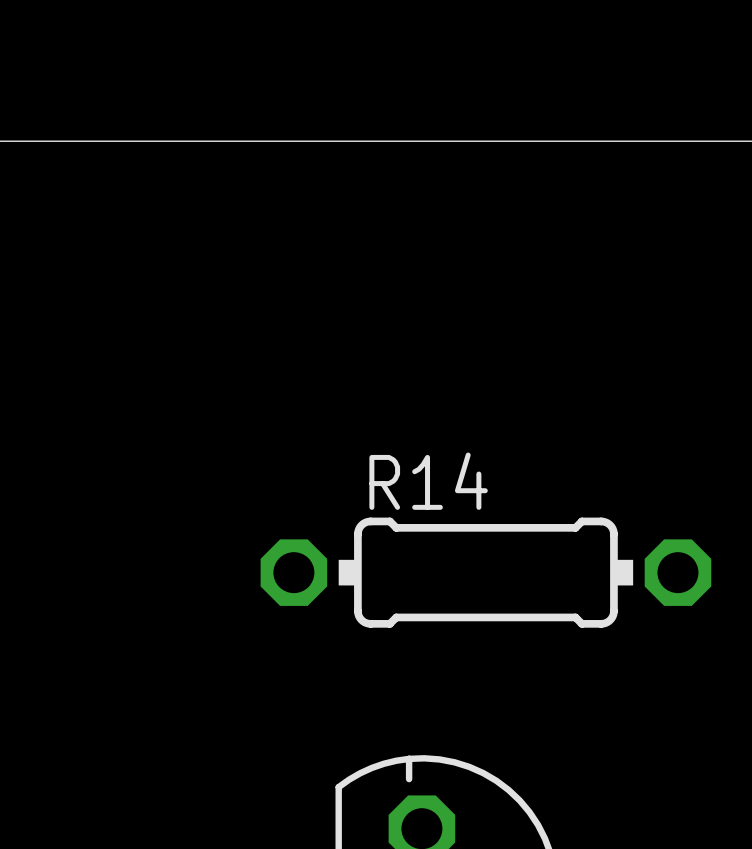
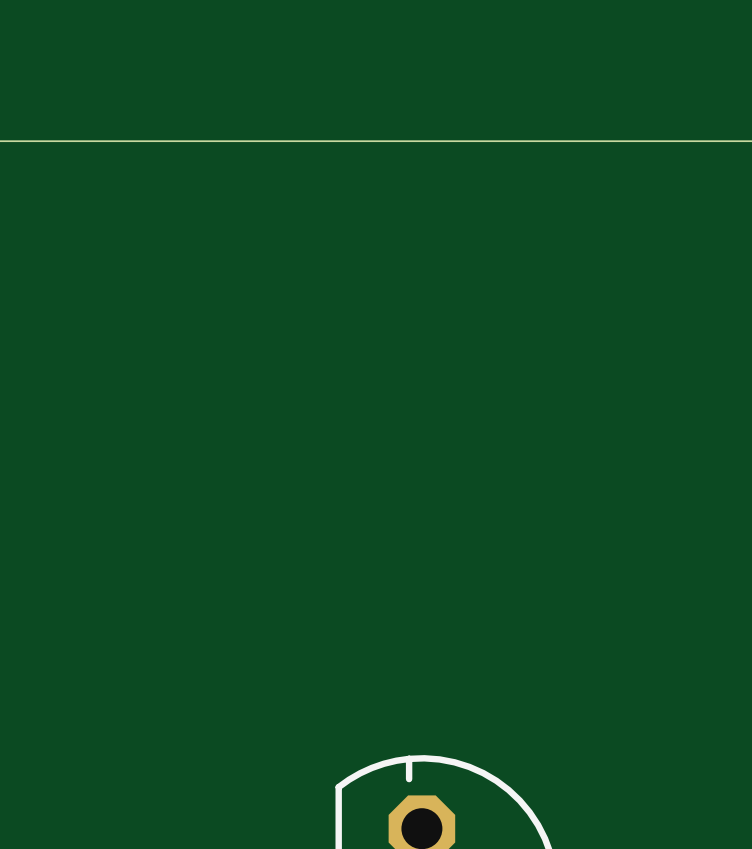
R14: (485, 572) -> none

